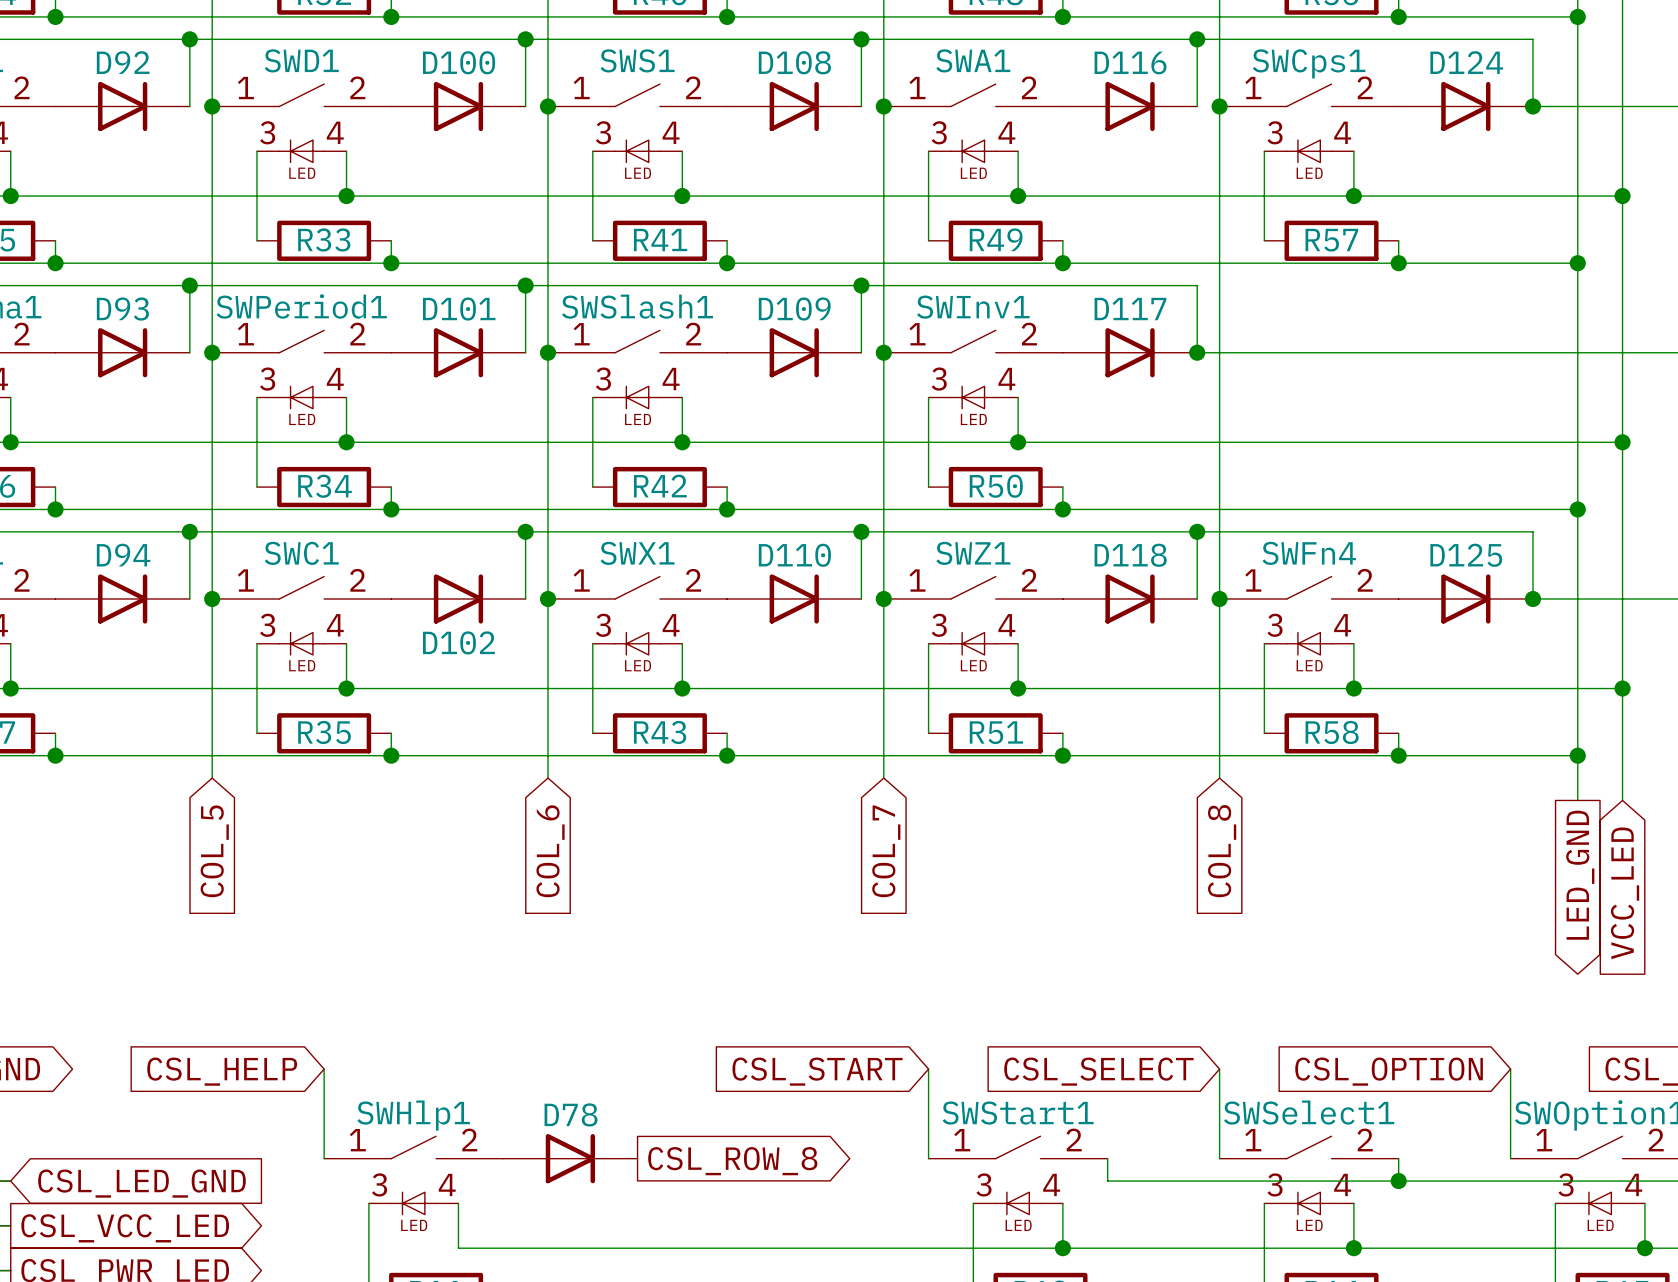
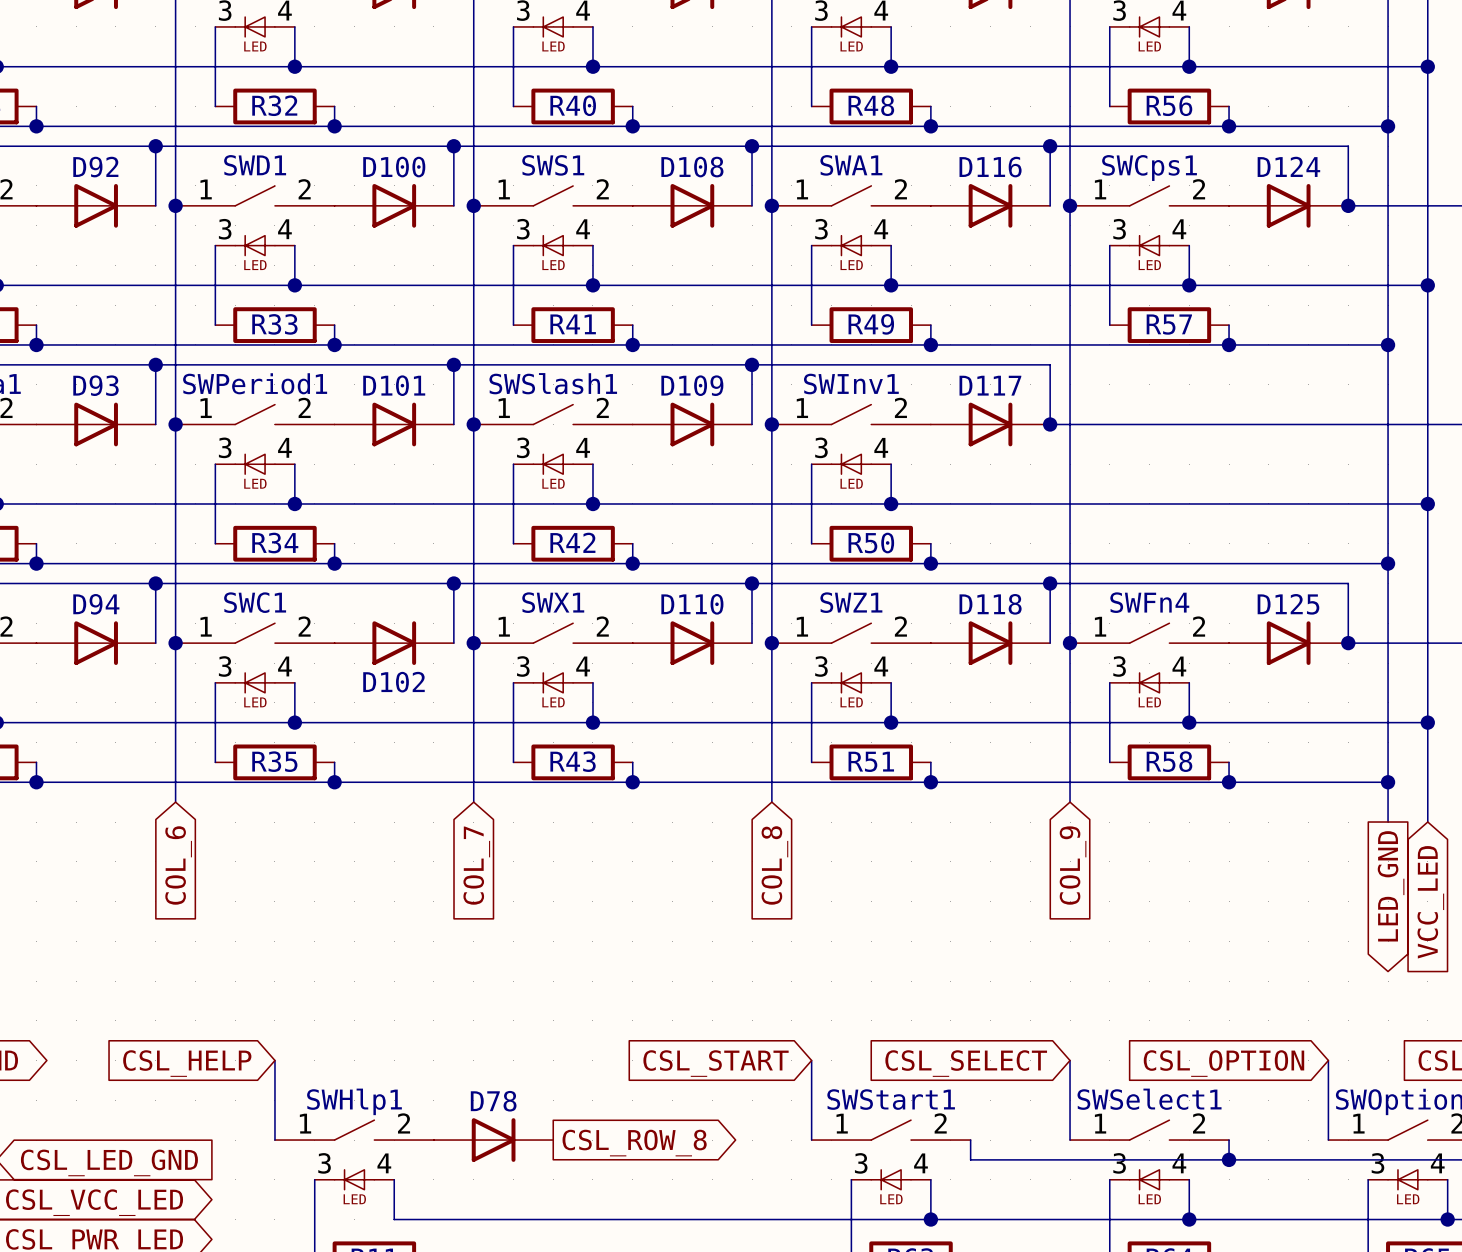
global label: COL_5 (214, 851) -> COL_6 (178, 865)
global label: COL_6 (550, 851) -> COL_7 (476, 865)
global label: COL_7 (886, 851) -> COL_8 (774, 865)
global label: COL_8 (1222, 851) -> COL_9 (1073, 865)

